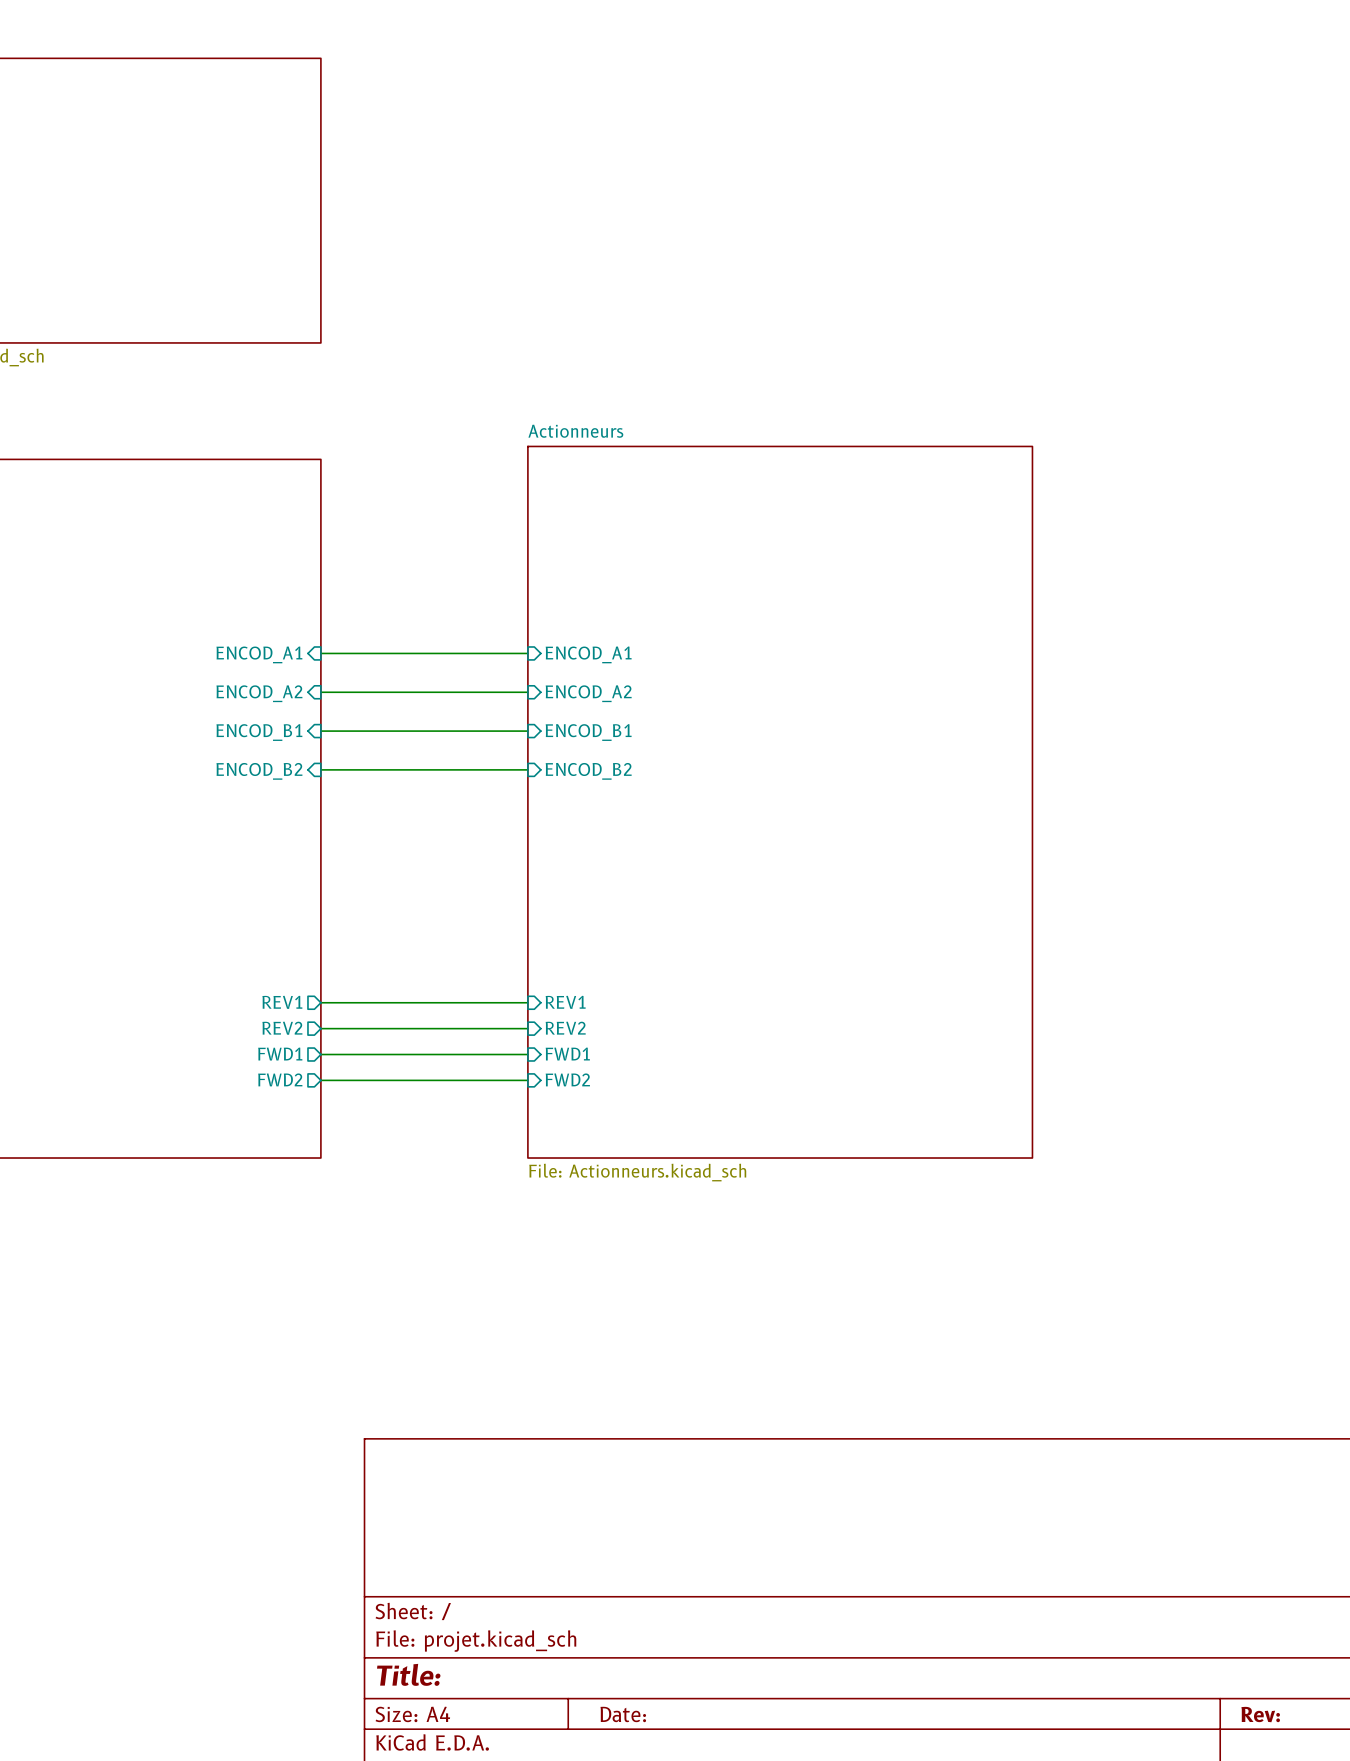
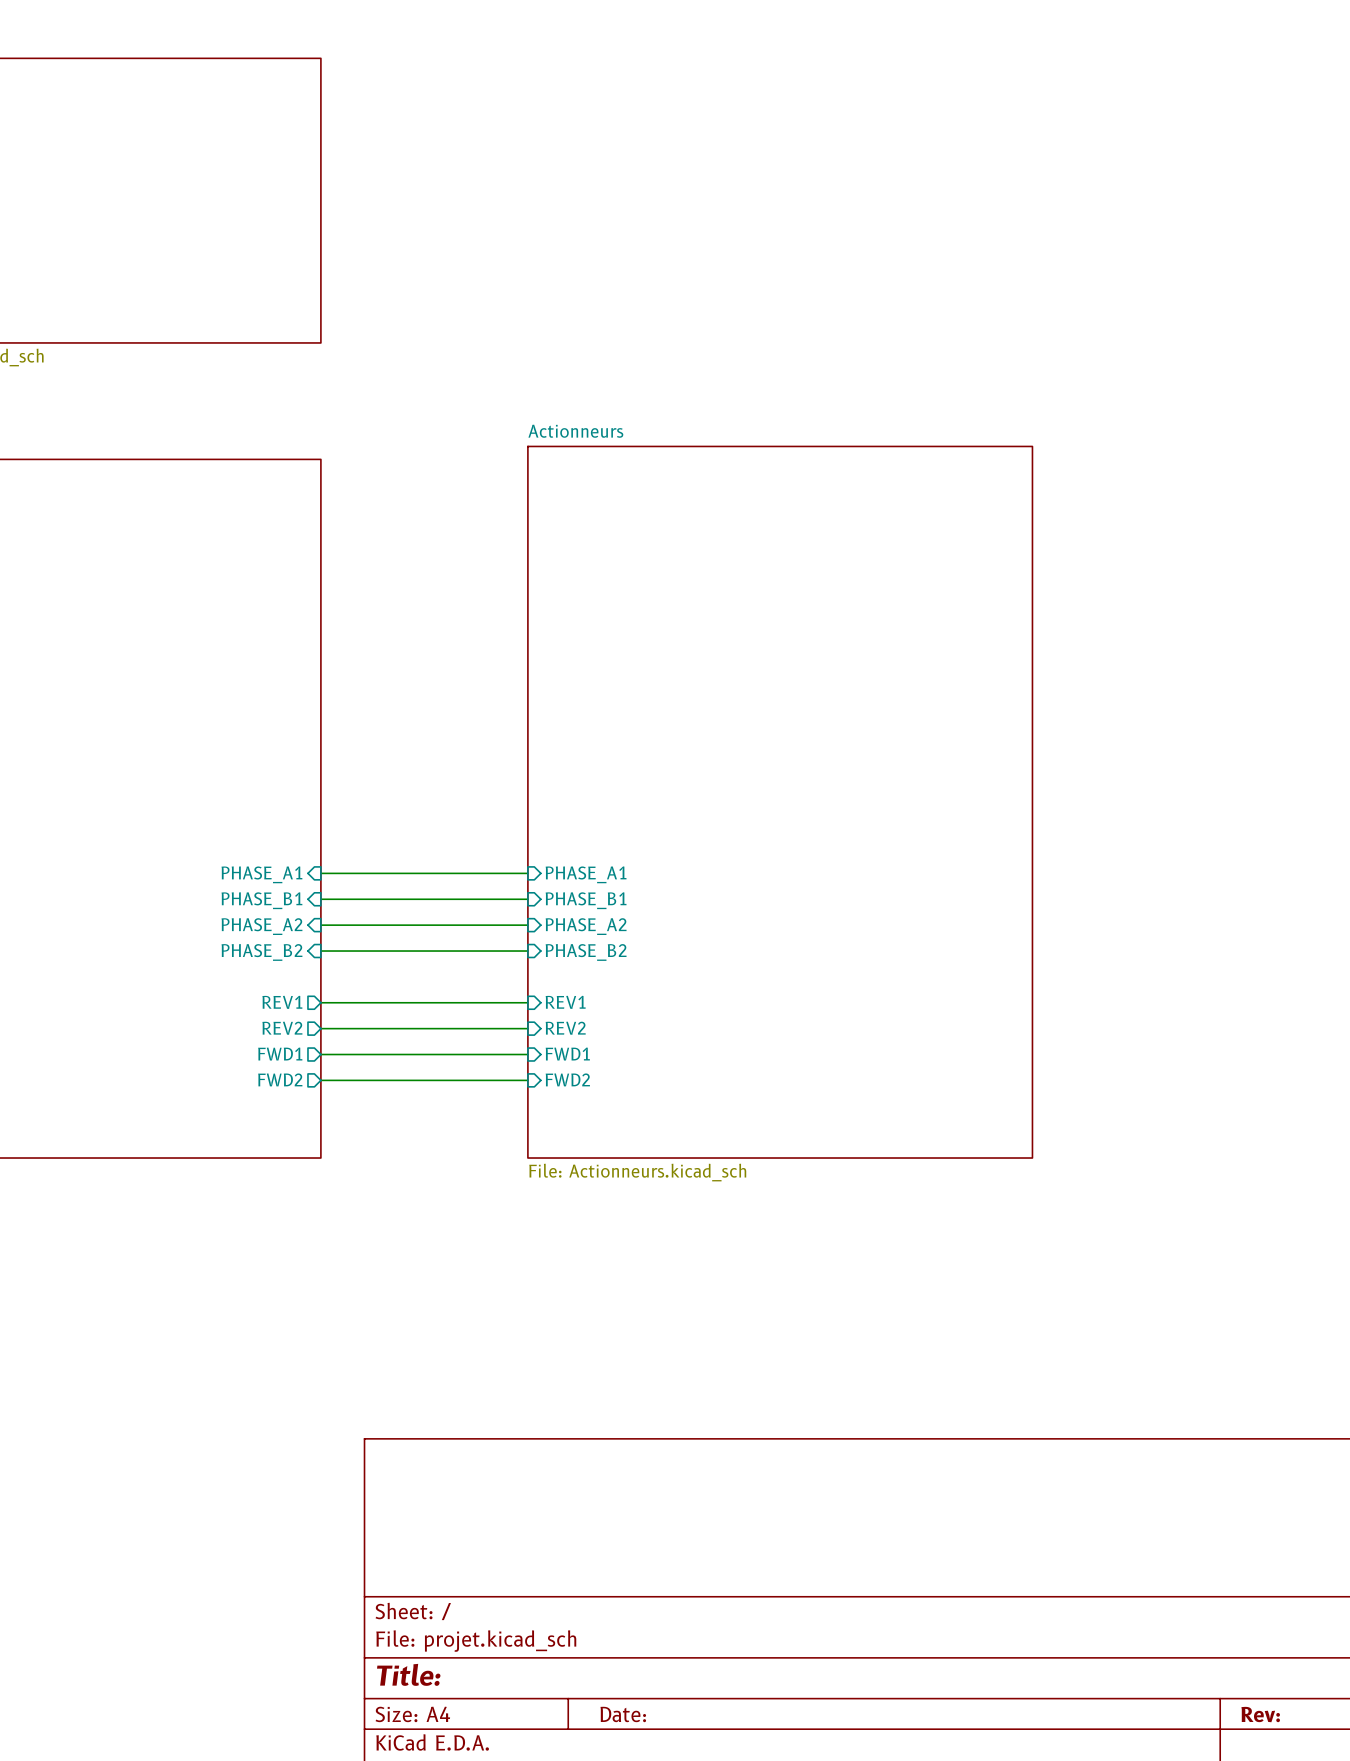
wire: (320, 653) (527, 653) -> none
sheet pin: ENCOD_A1 (259, 654) -> none
sheet pin: ENCOD_A1 (588, 654) -> none
wire: (320, 692) (527, 692) -> (320, 873) (527, 873)
sheet pin: ENCOD_A2 (259, 693) -> none
sheet pin: ENCOD_A2 (588, 693) -> none
wire: (320, 731) (527, 731) -> (320, 899) (527, 899)
sheet pin: ENCOD_B1 (259, 732) -> none
sheet pin: ENCOD_B1 (588, 732) -> none
wire: (320, 769) (527, 769) -> (320, 951) (527, 951)
sheet pin: ENCOD_B2 (259, 771) -> none
sheet pin: ENCOD_B2 (588, 771) -> none
sheet pin: none -> PHASE_A1 (261, 874)
sheet pin: none -> PHASE_A1 (586, 874)
sheet pin: none -> PHASE_B1 (261, 900)
sheet pin: none -> PHASE_B1 (586, 900)
wire: none -> (320, 925) (527, 925)
sheet pin: none -> PHASE_A2 (261, 926)
sheet pin: none -> PHASE_A2 (586, 926)
sheet pin: none -> PHASE_B2 (261, 952)
sheet pin: none -> PHASE_B2 (586, 952)

